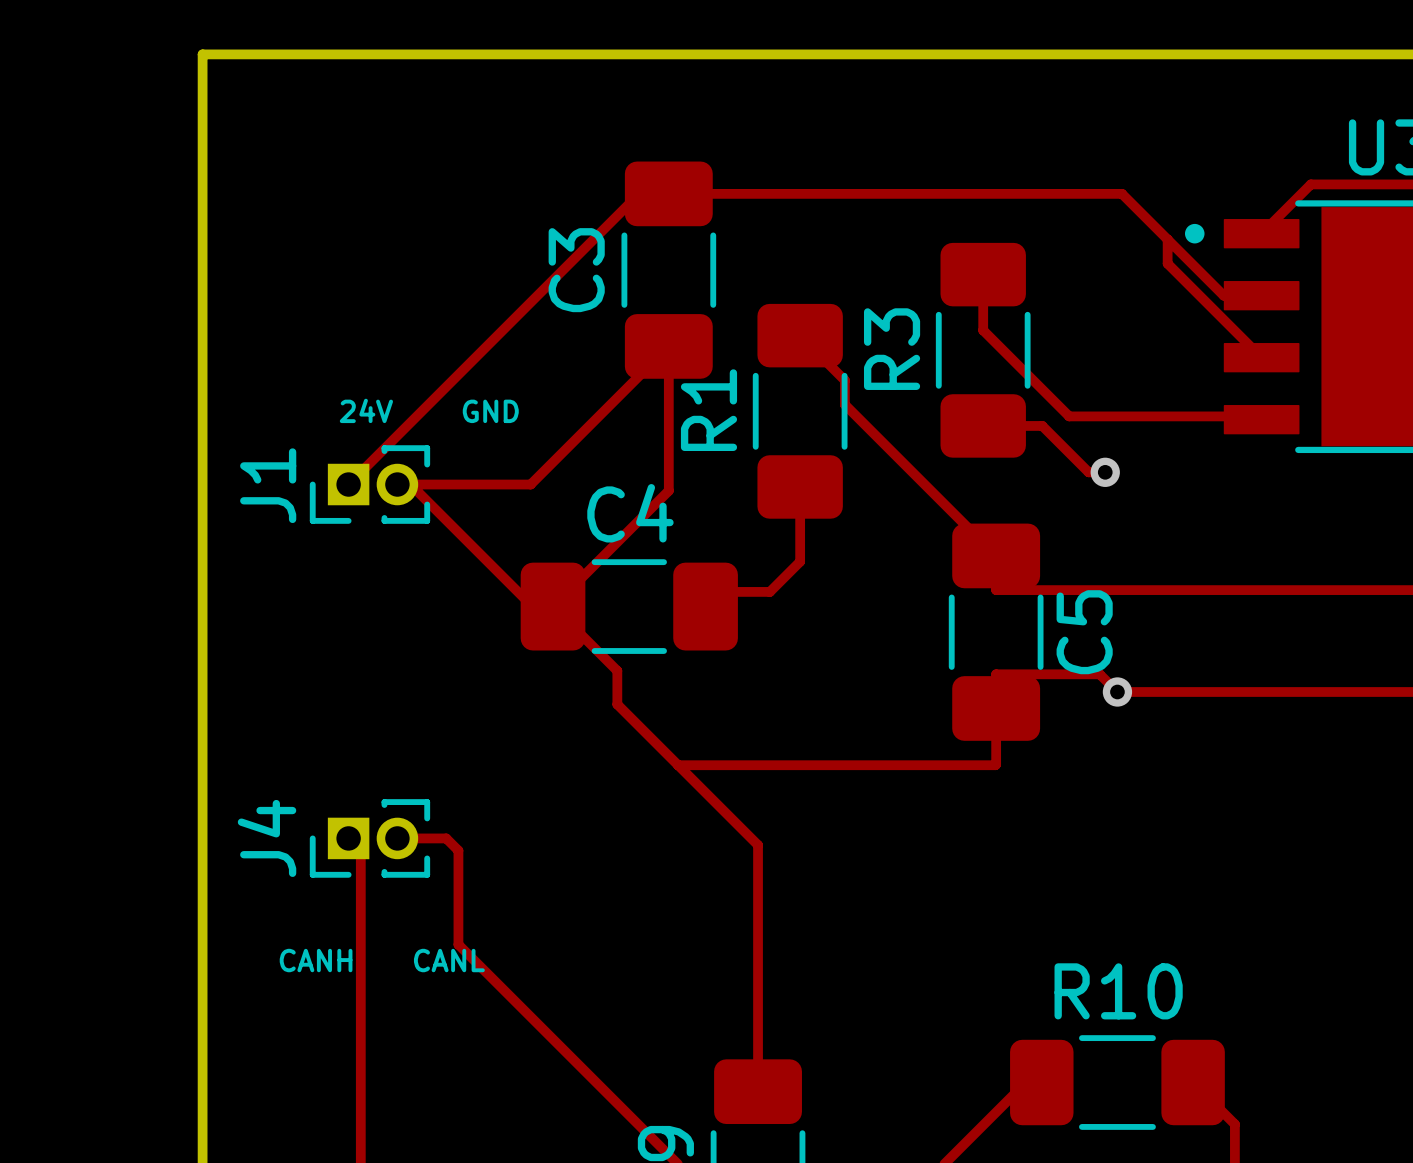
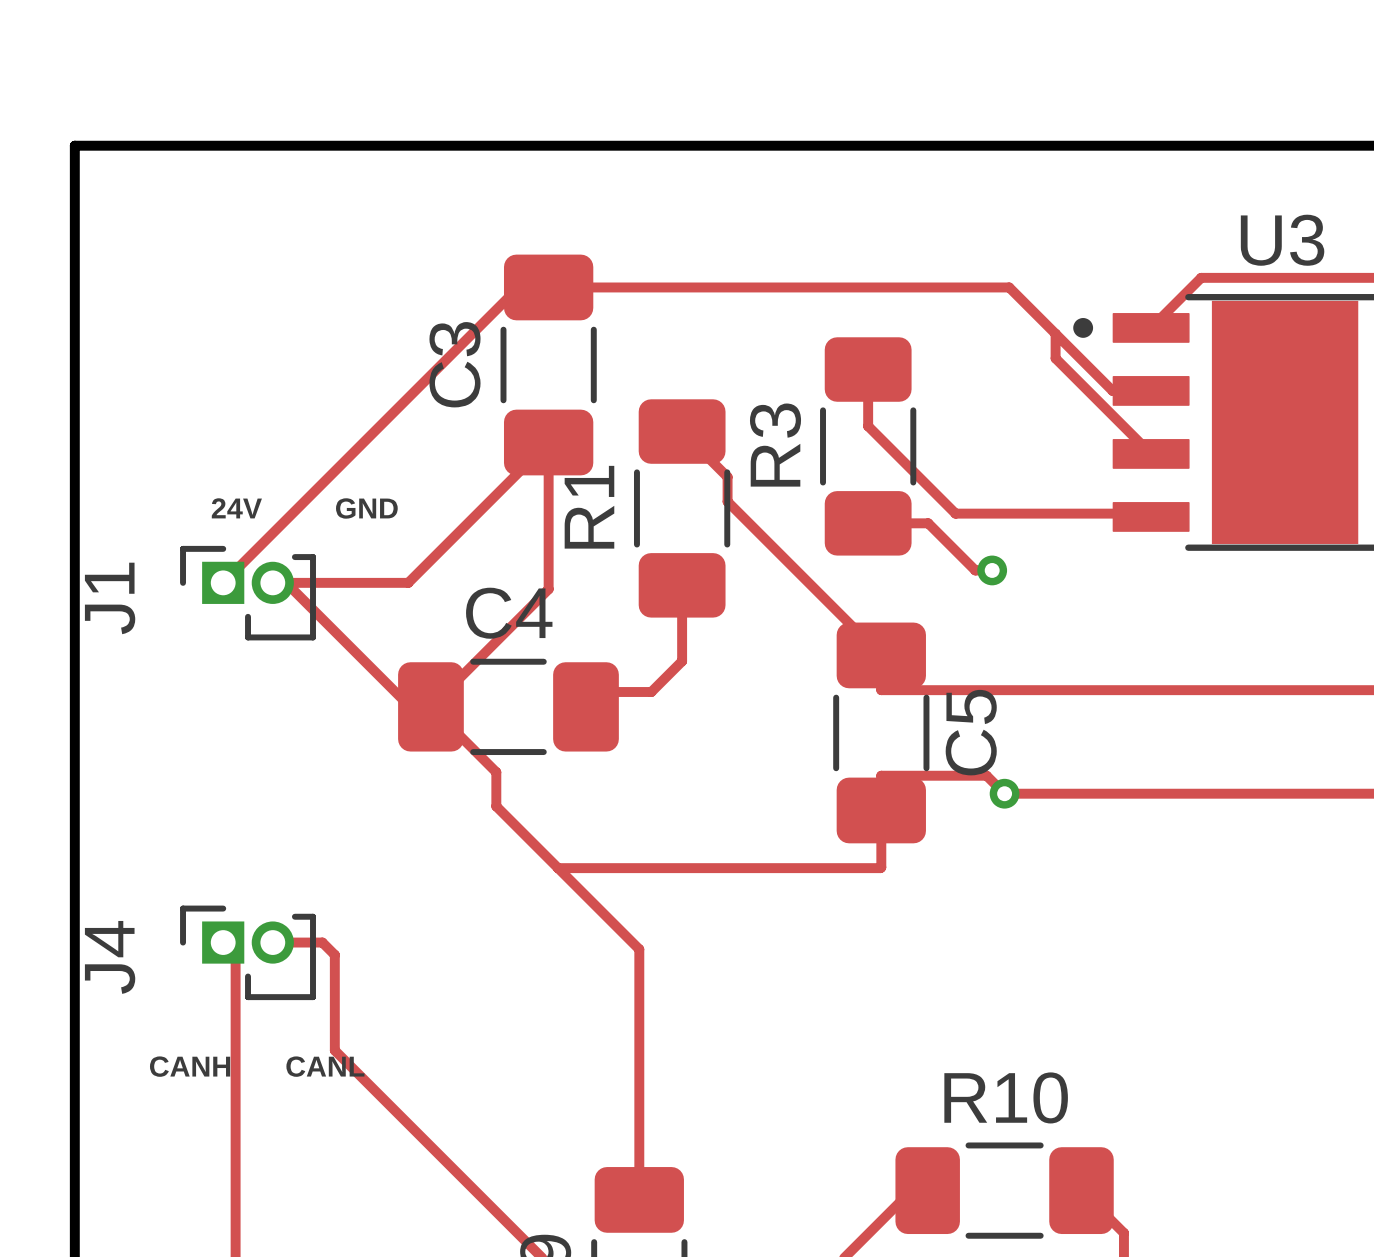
J1 footprint: [309, 445, 431, 524] -> [180, 545, 316, 641]
J1 name position: J1 (268, 485) -> J1 (110, 598)
J4 footprint: [309, 799, 431, 878] -> [180, 905, 316, 1001]
J4 name position: J4 (267, 838) -> J4 (110, 957)

